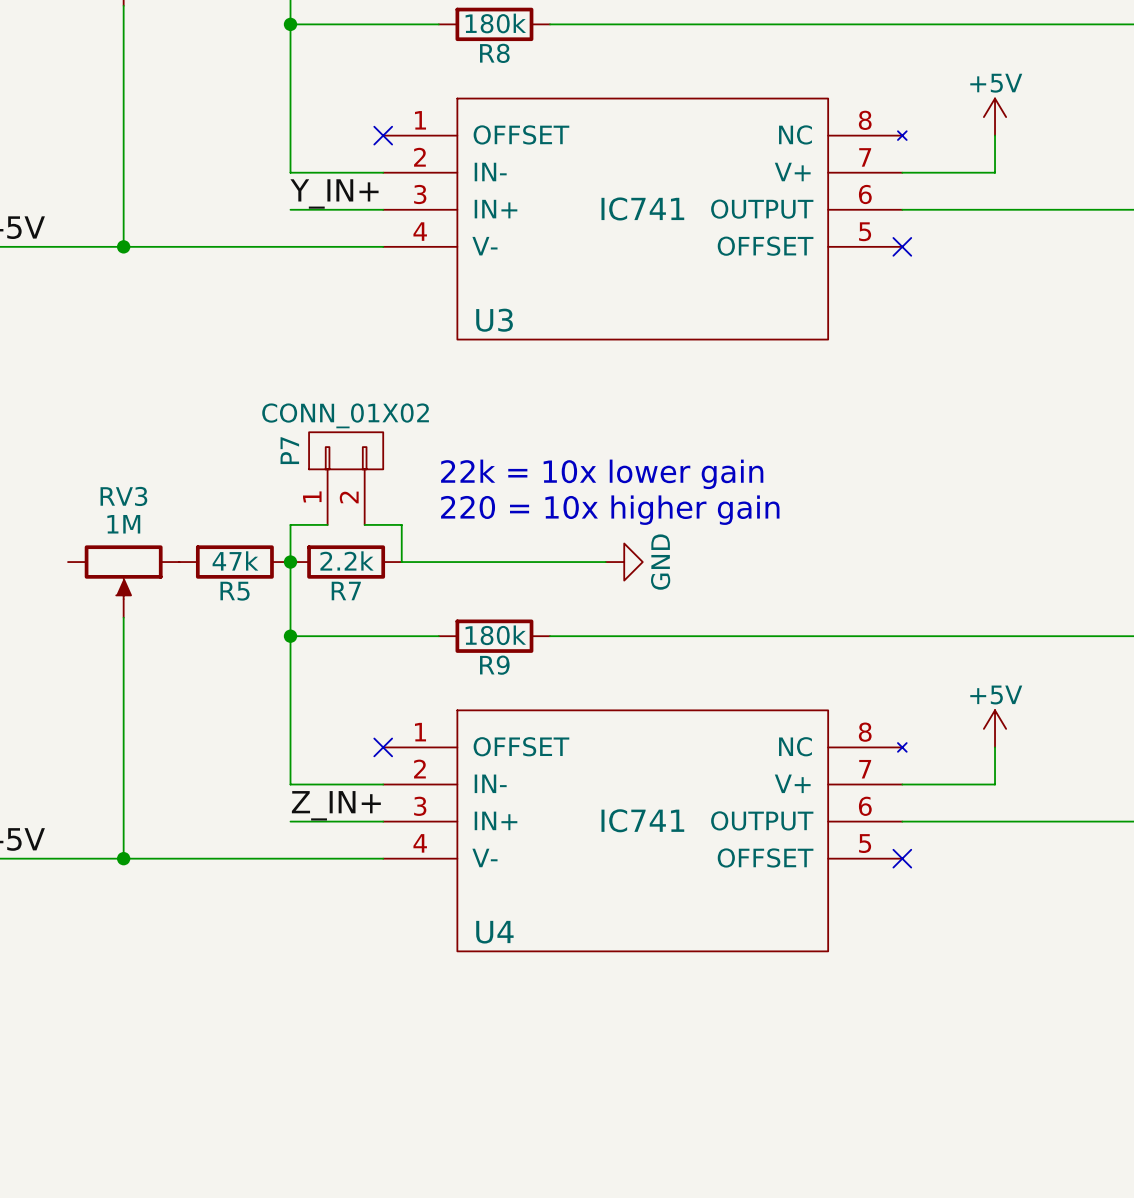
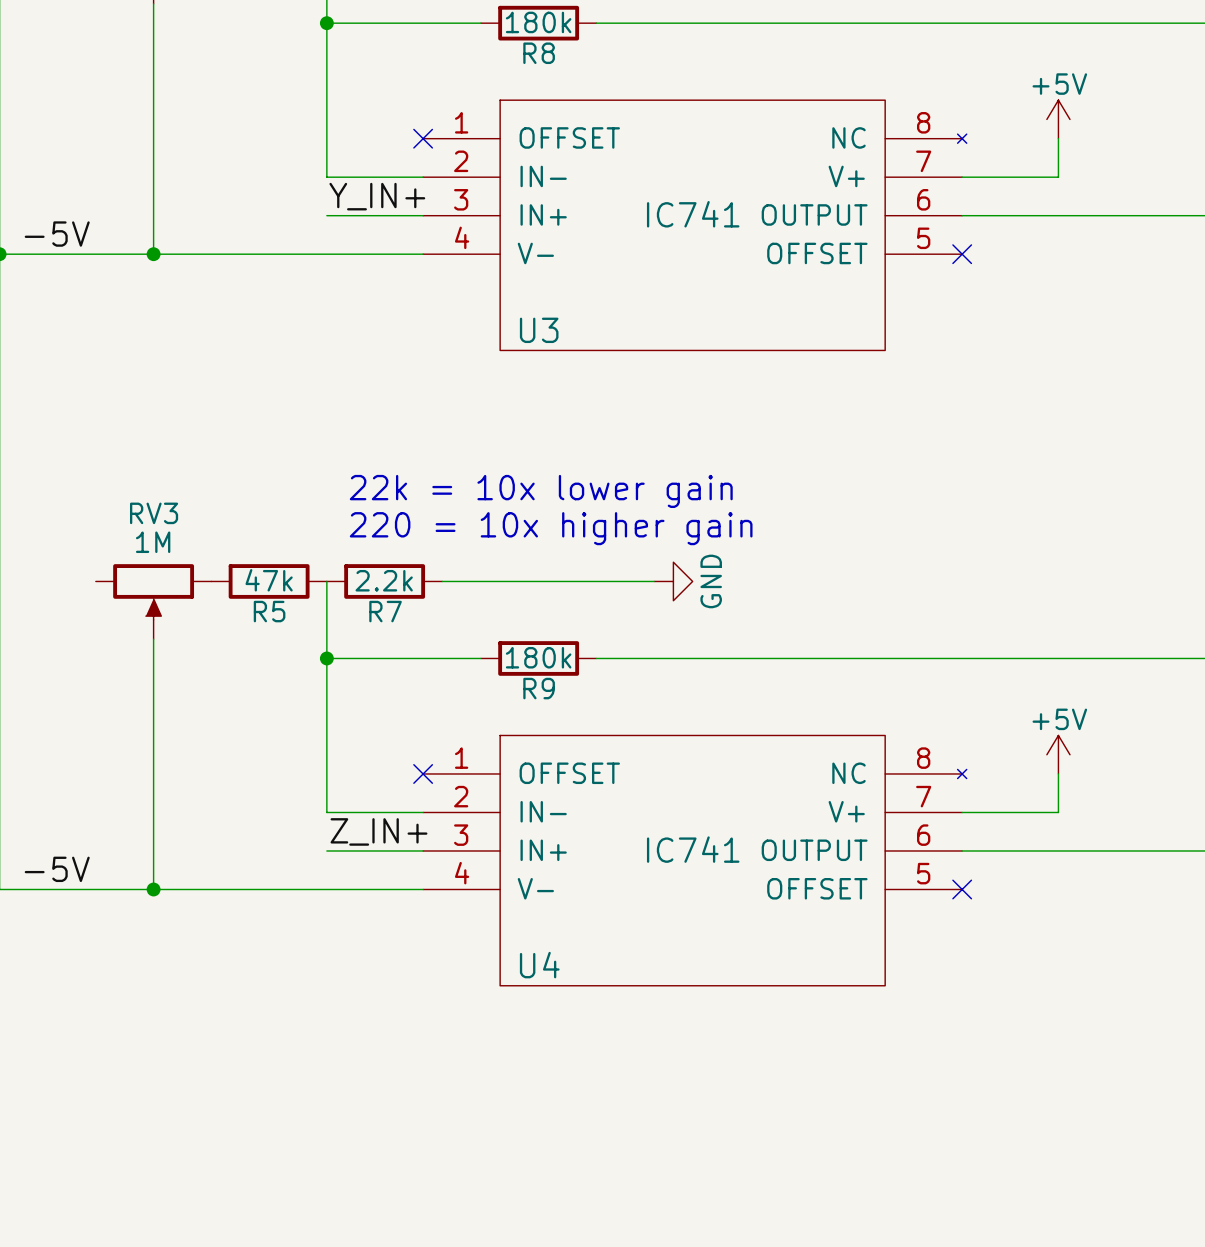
text position: 22k = 10x lower gain (602, 474) -> 22k = 10x lower gain (541, 491)
P7: CONN_01X02 (346, 478) -> none
text position: 220 = 10x higher gain (610, 510) -> 220 = 10x higher gain (551, 528)
wire: (327, 524) (290, 524) (290, 562) -> none
wire: (364, 524) (401, 524) (401, 562) -> none
junction: (290, 562) -> none

